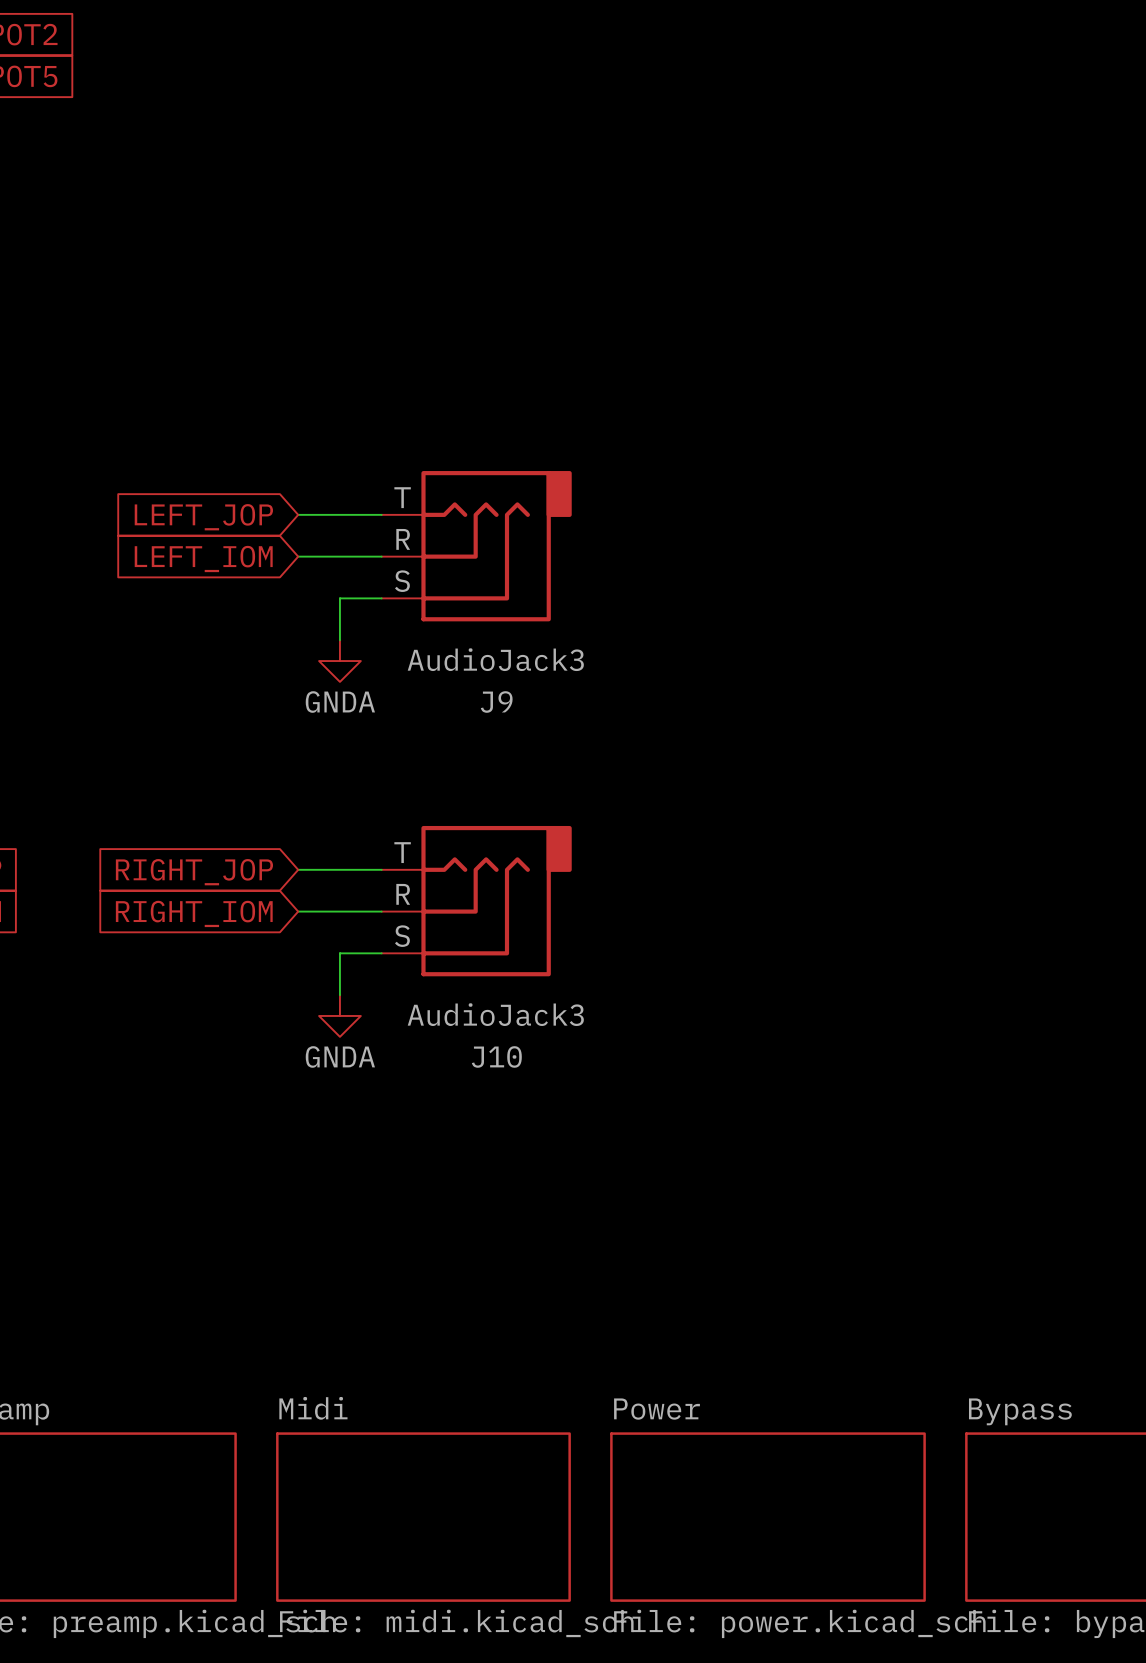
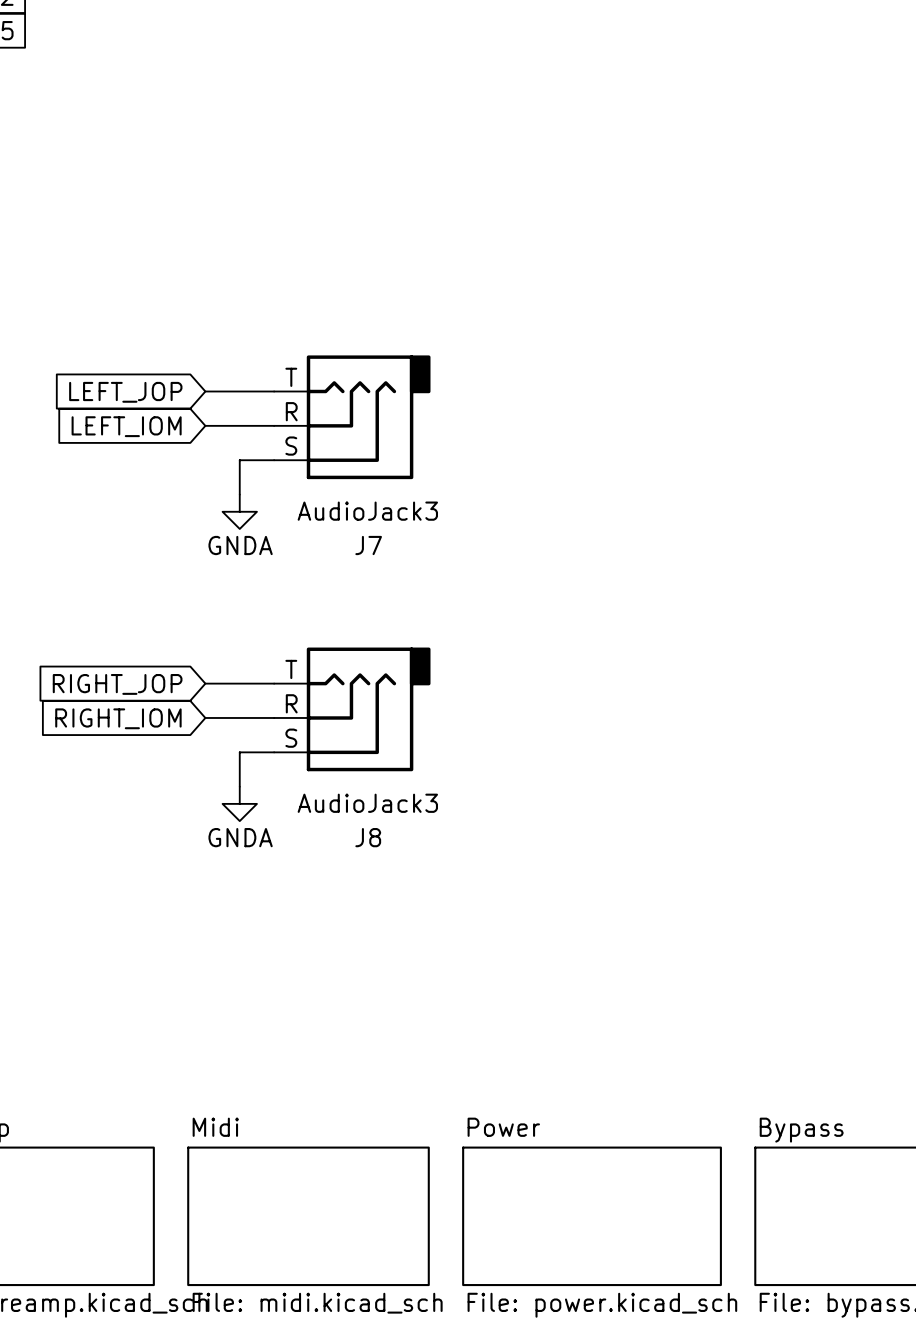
J9 name: J9 (496, 702) -> J7 (368, 545)
J10 name: J10 (496, 1056) -> J8 (368, 837)

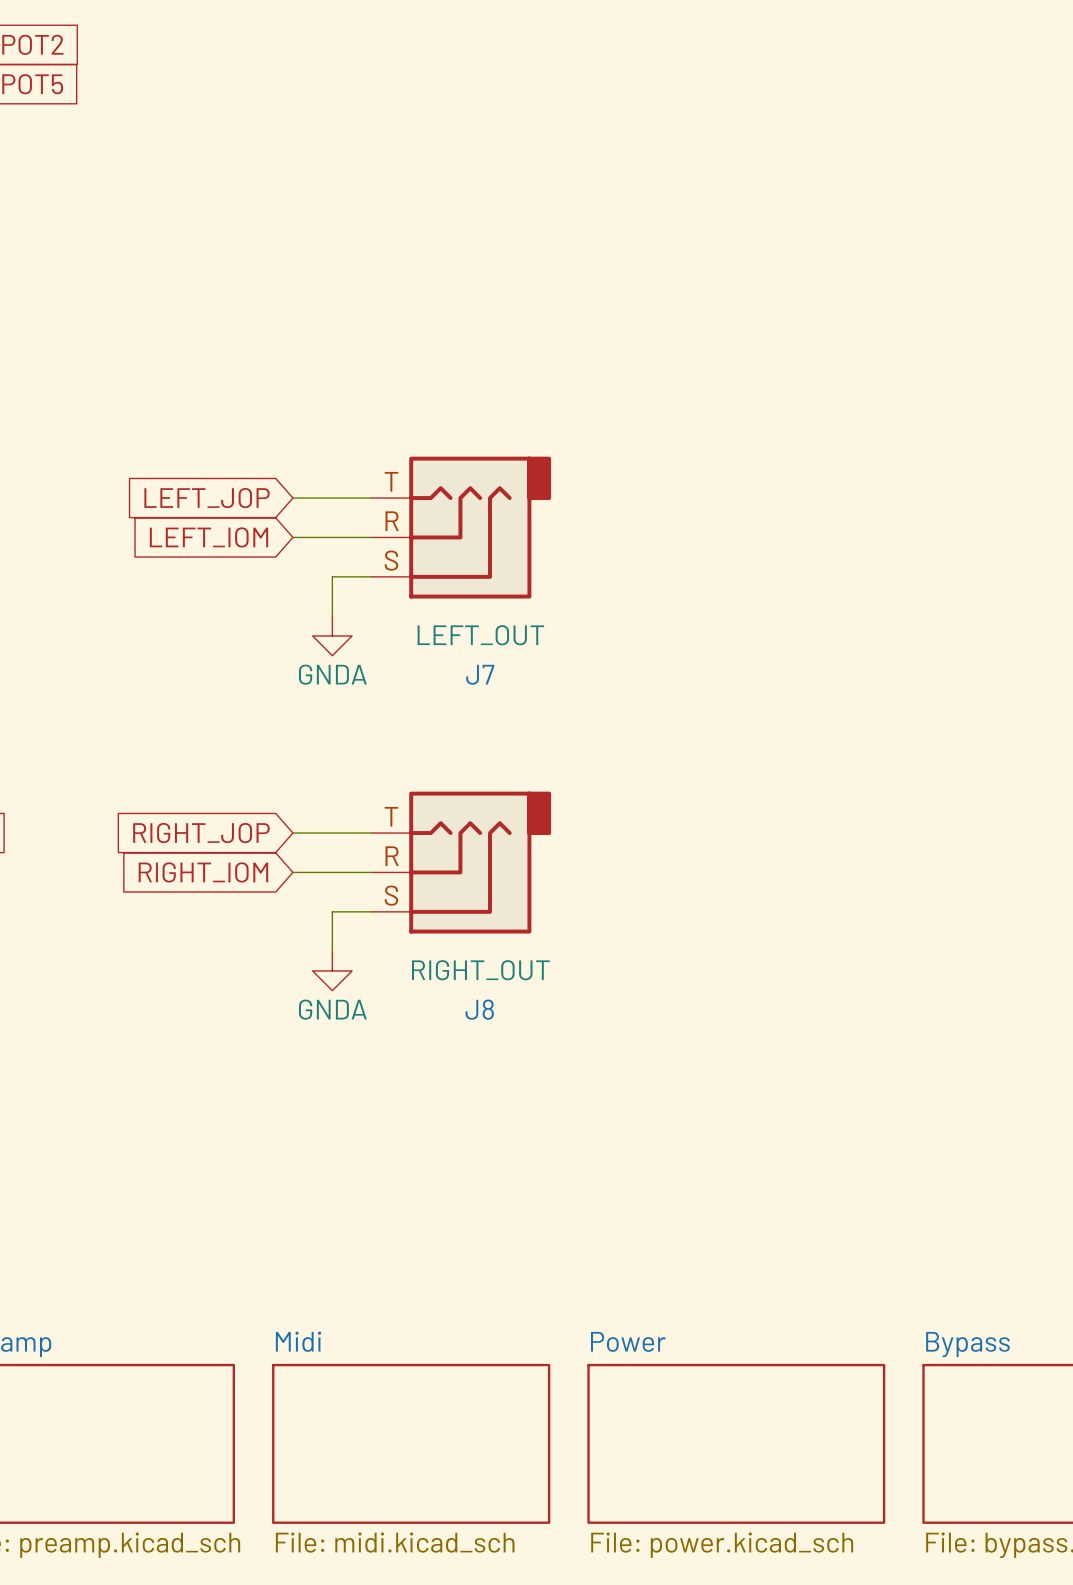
J7 value: AudioJack3 (367, 511) -> LEFT_OUT (480, 635)
J8 value: AudioJack3 (367, 803) -> RIGHT_OUT (480, 970)

